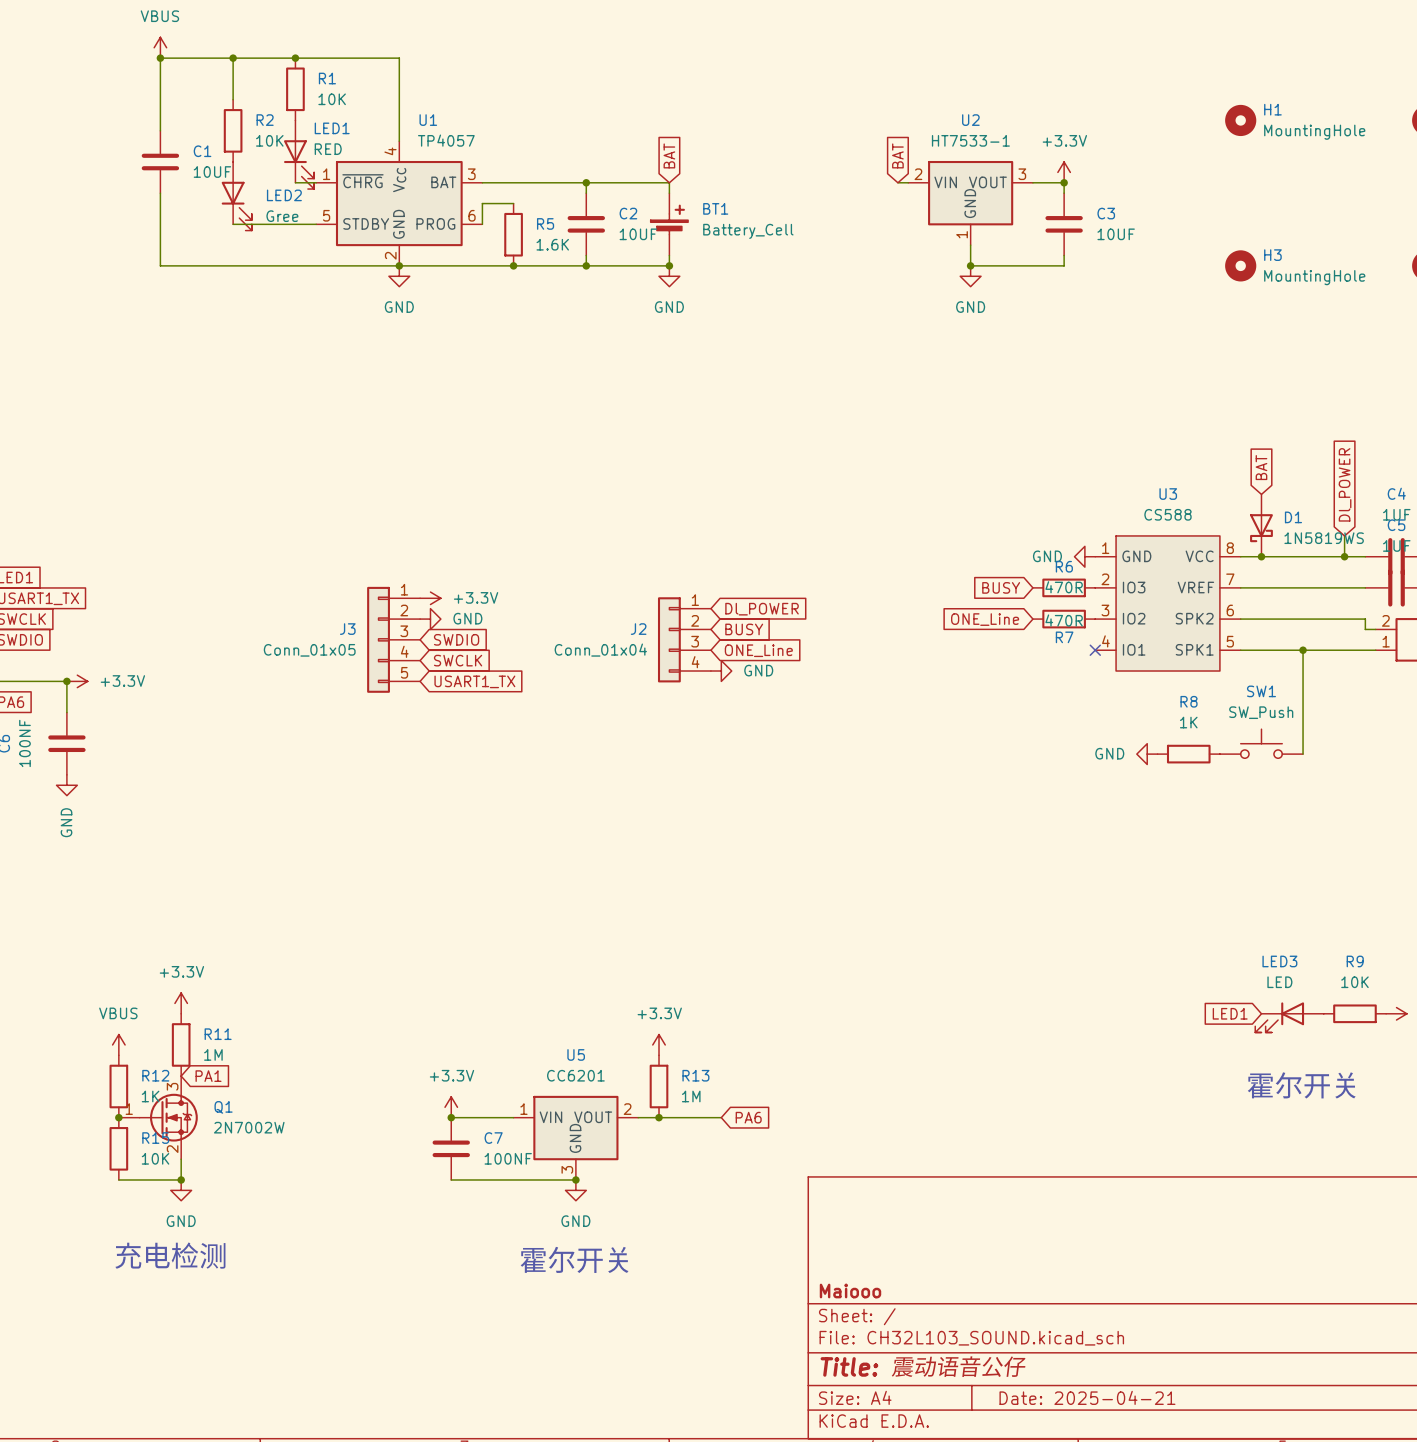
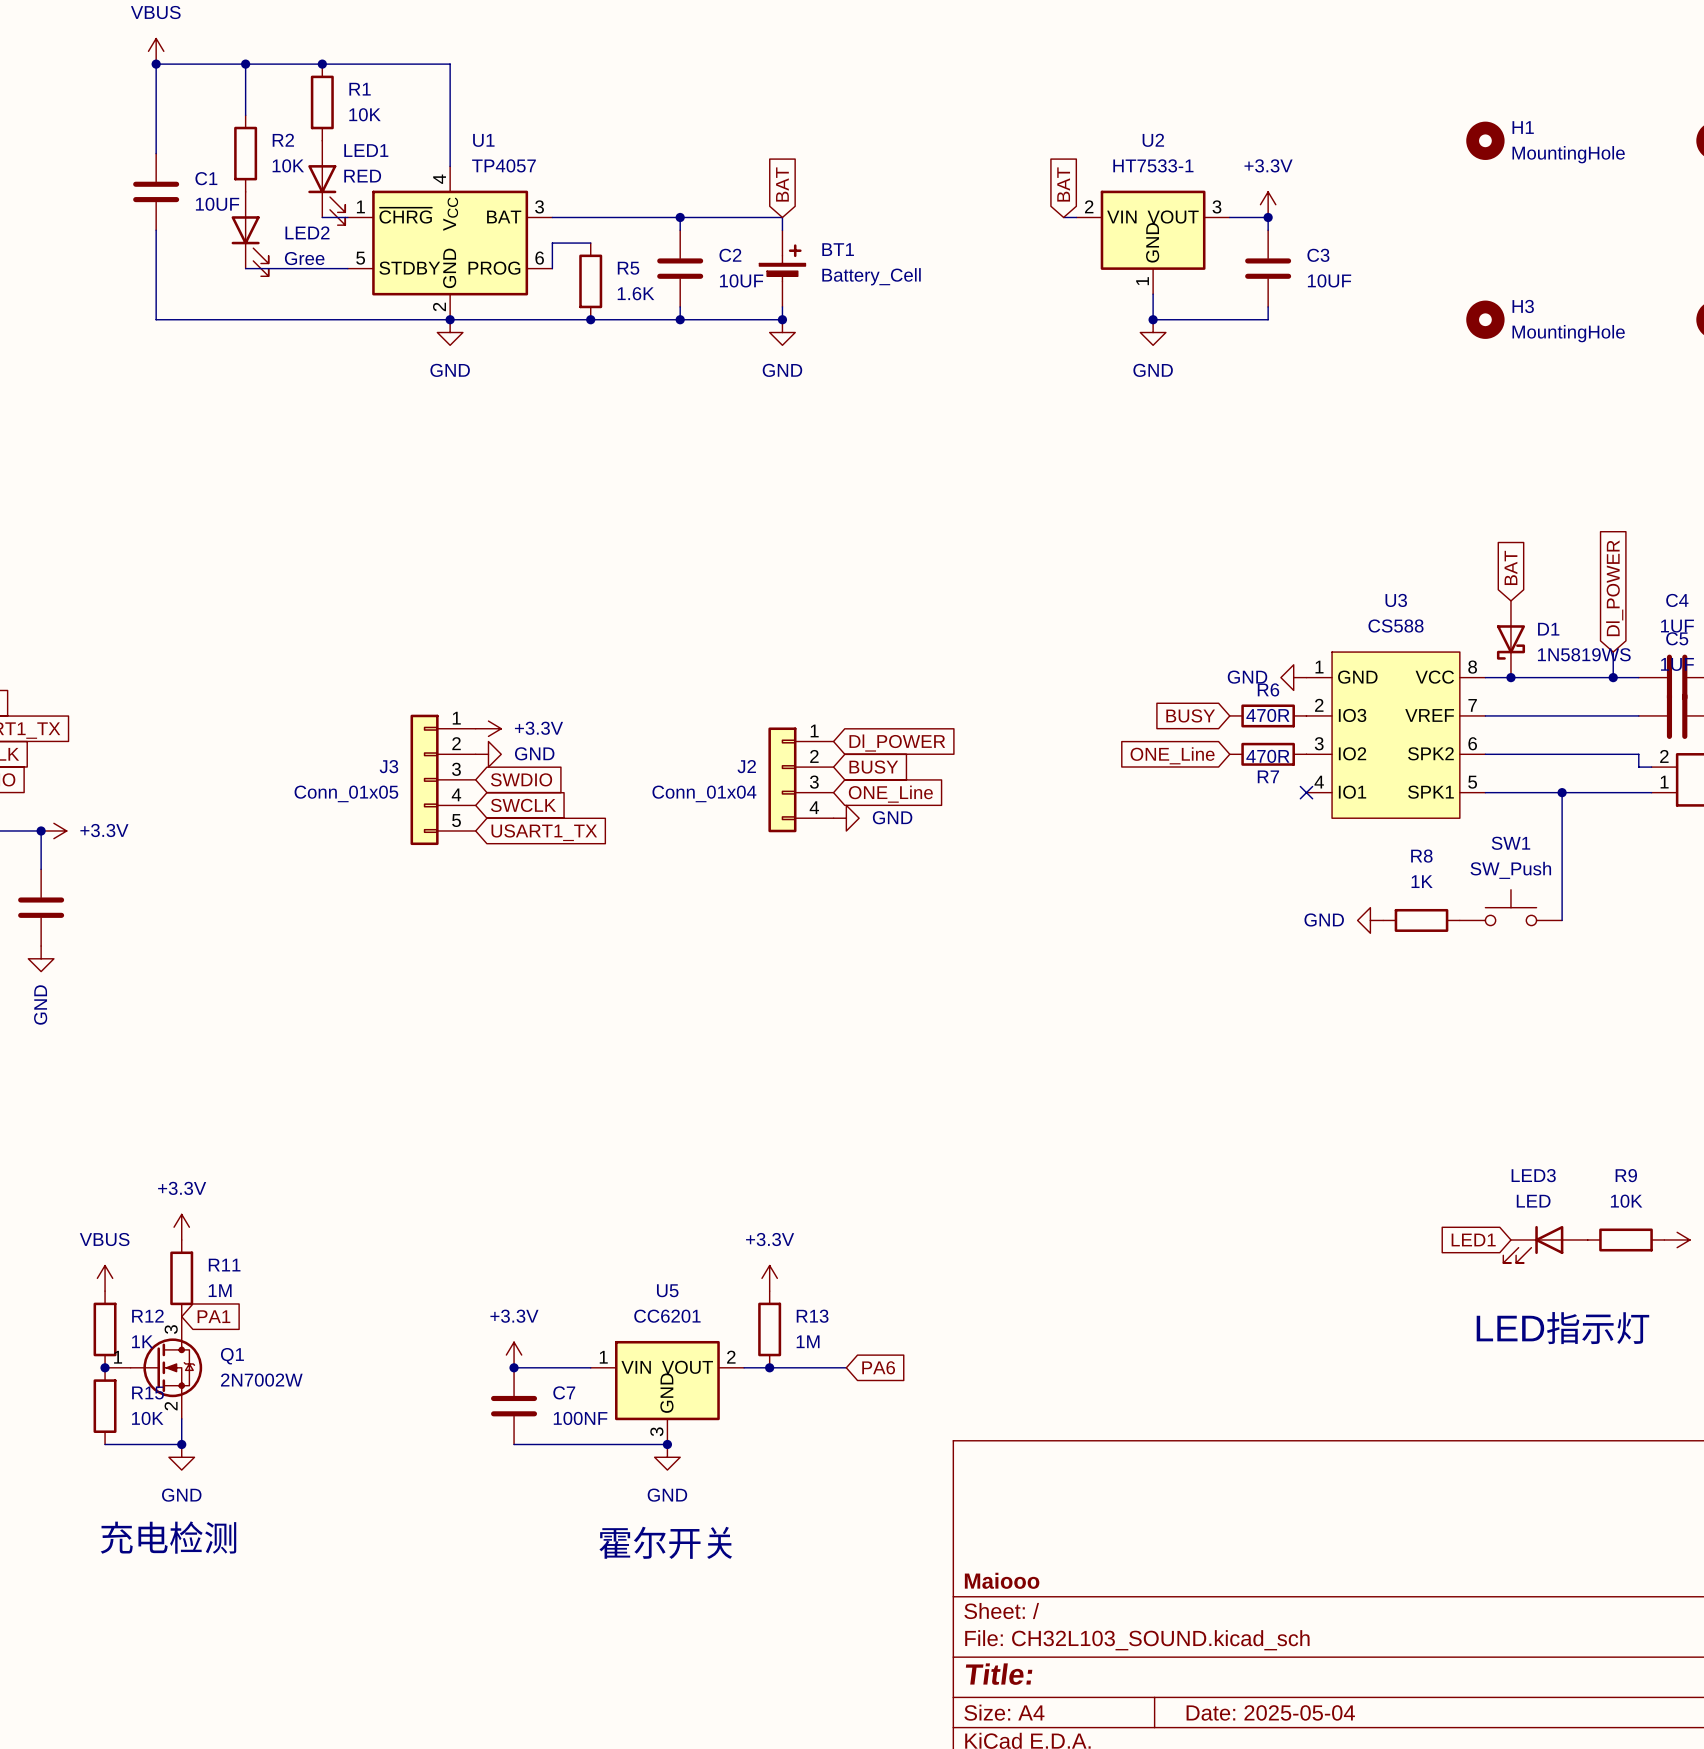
text: 霍尔开关 (1301, 1085) -> LED指示灯 (1562, 1328)
title block: Title: 震动语音公仔 (923, 1366) -> Title: (999, 1674)
title block: Date: 2025-04-21 (1087, 1397) -> Date: 2025-05-04 (1270, 1712)

